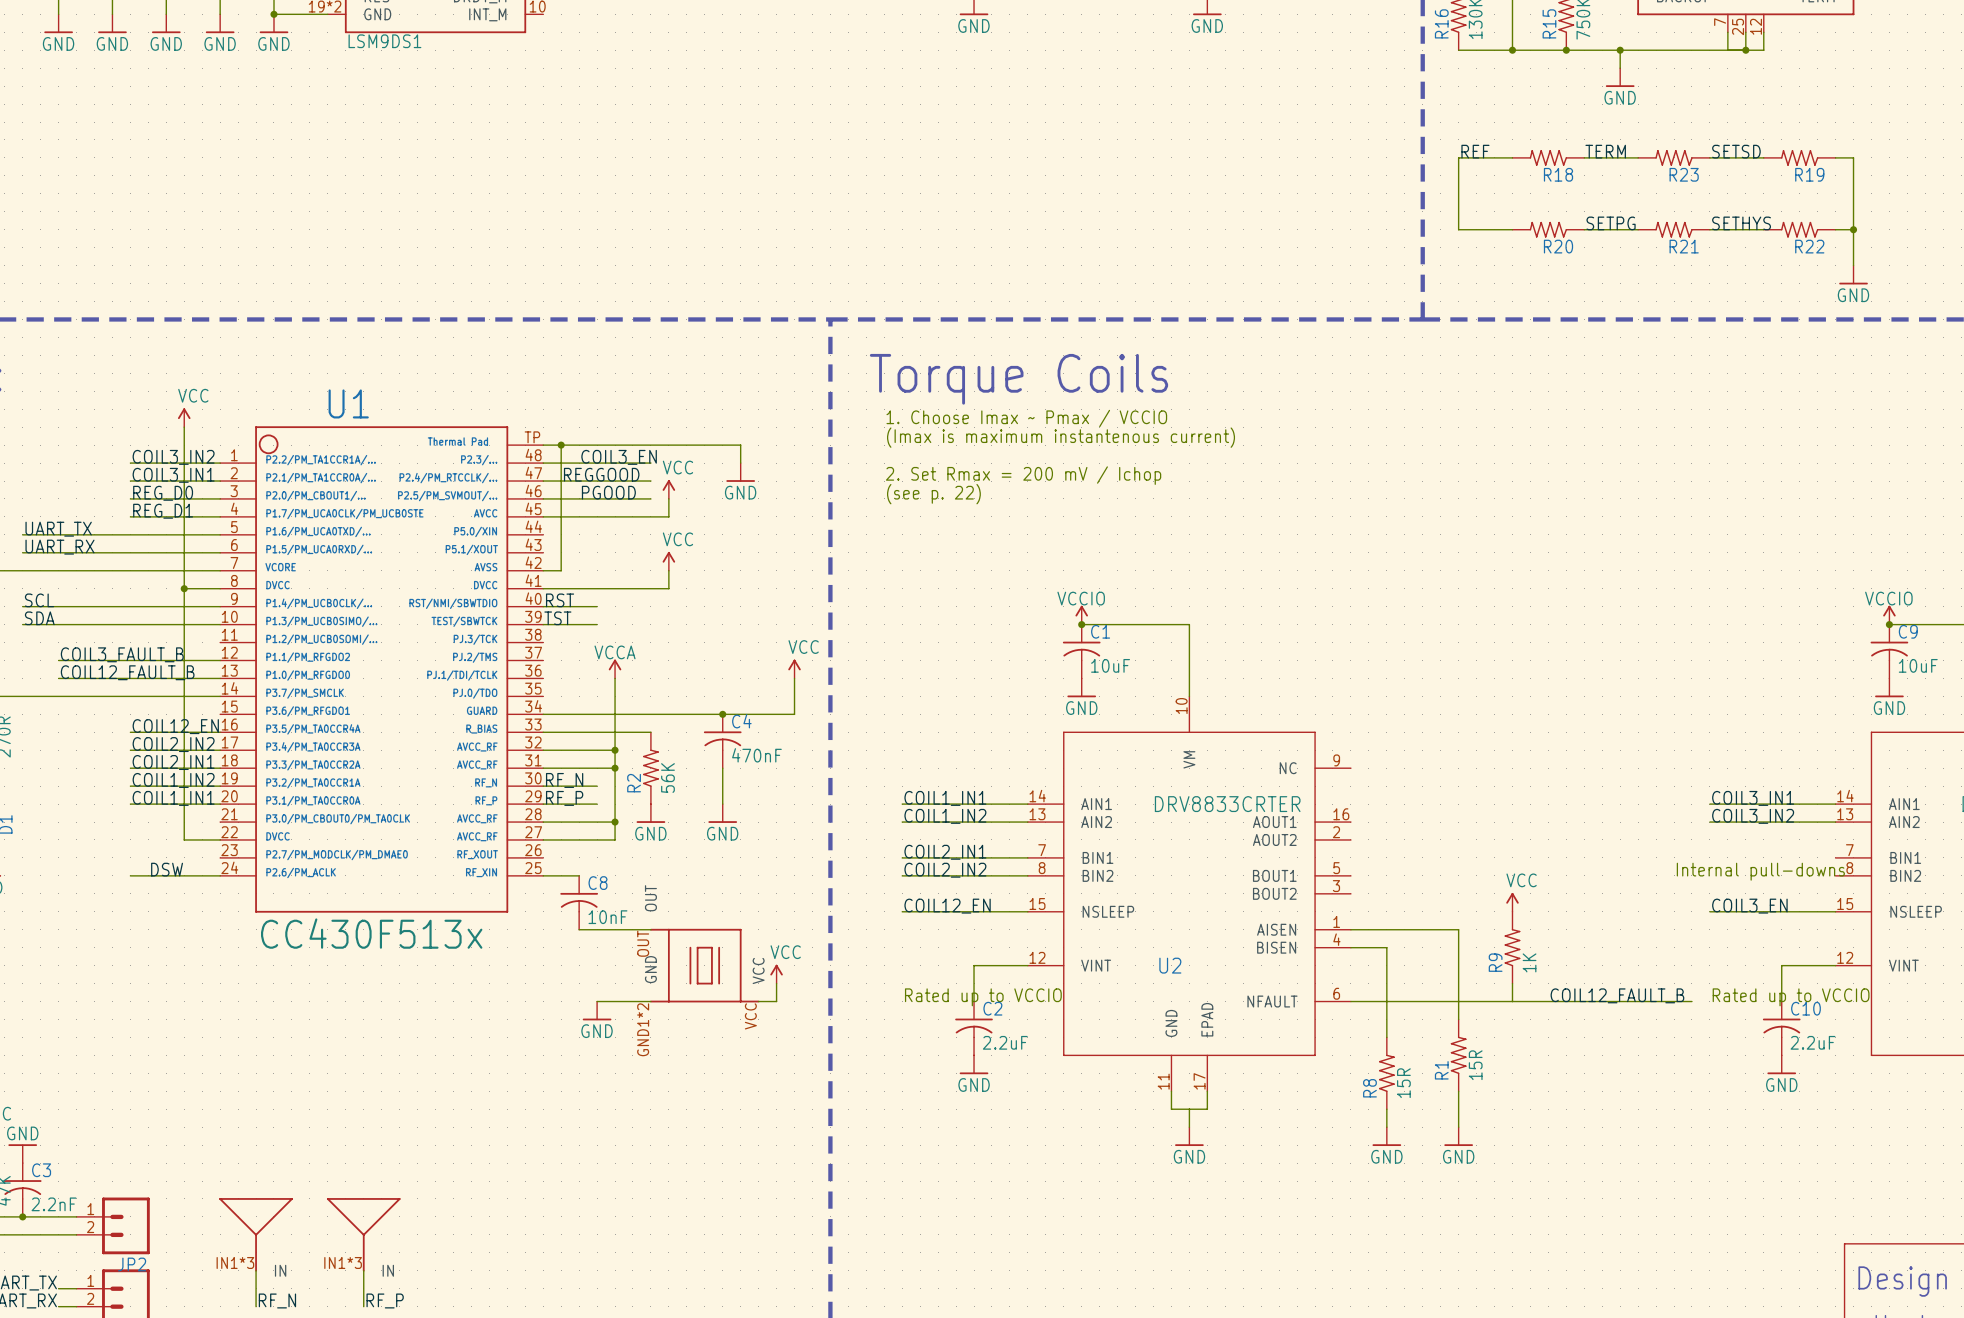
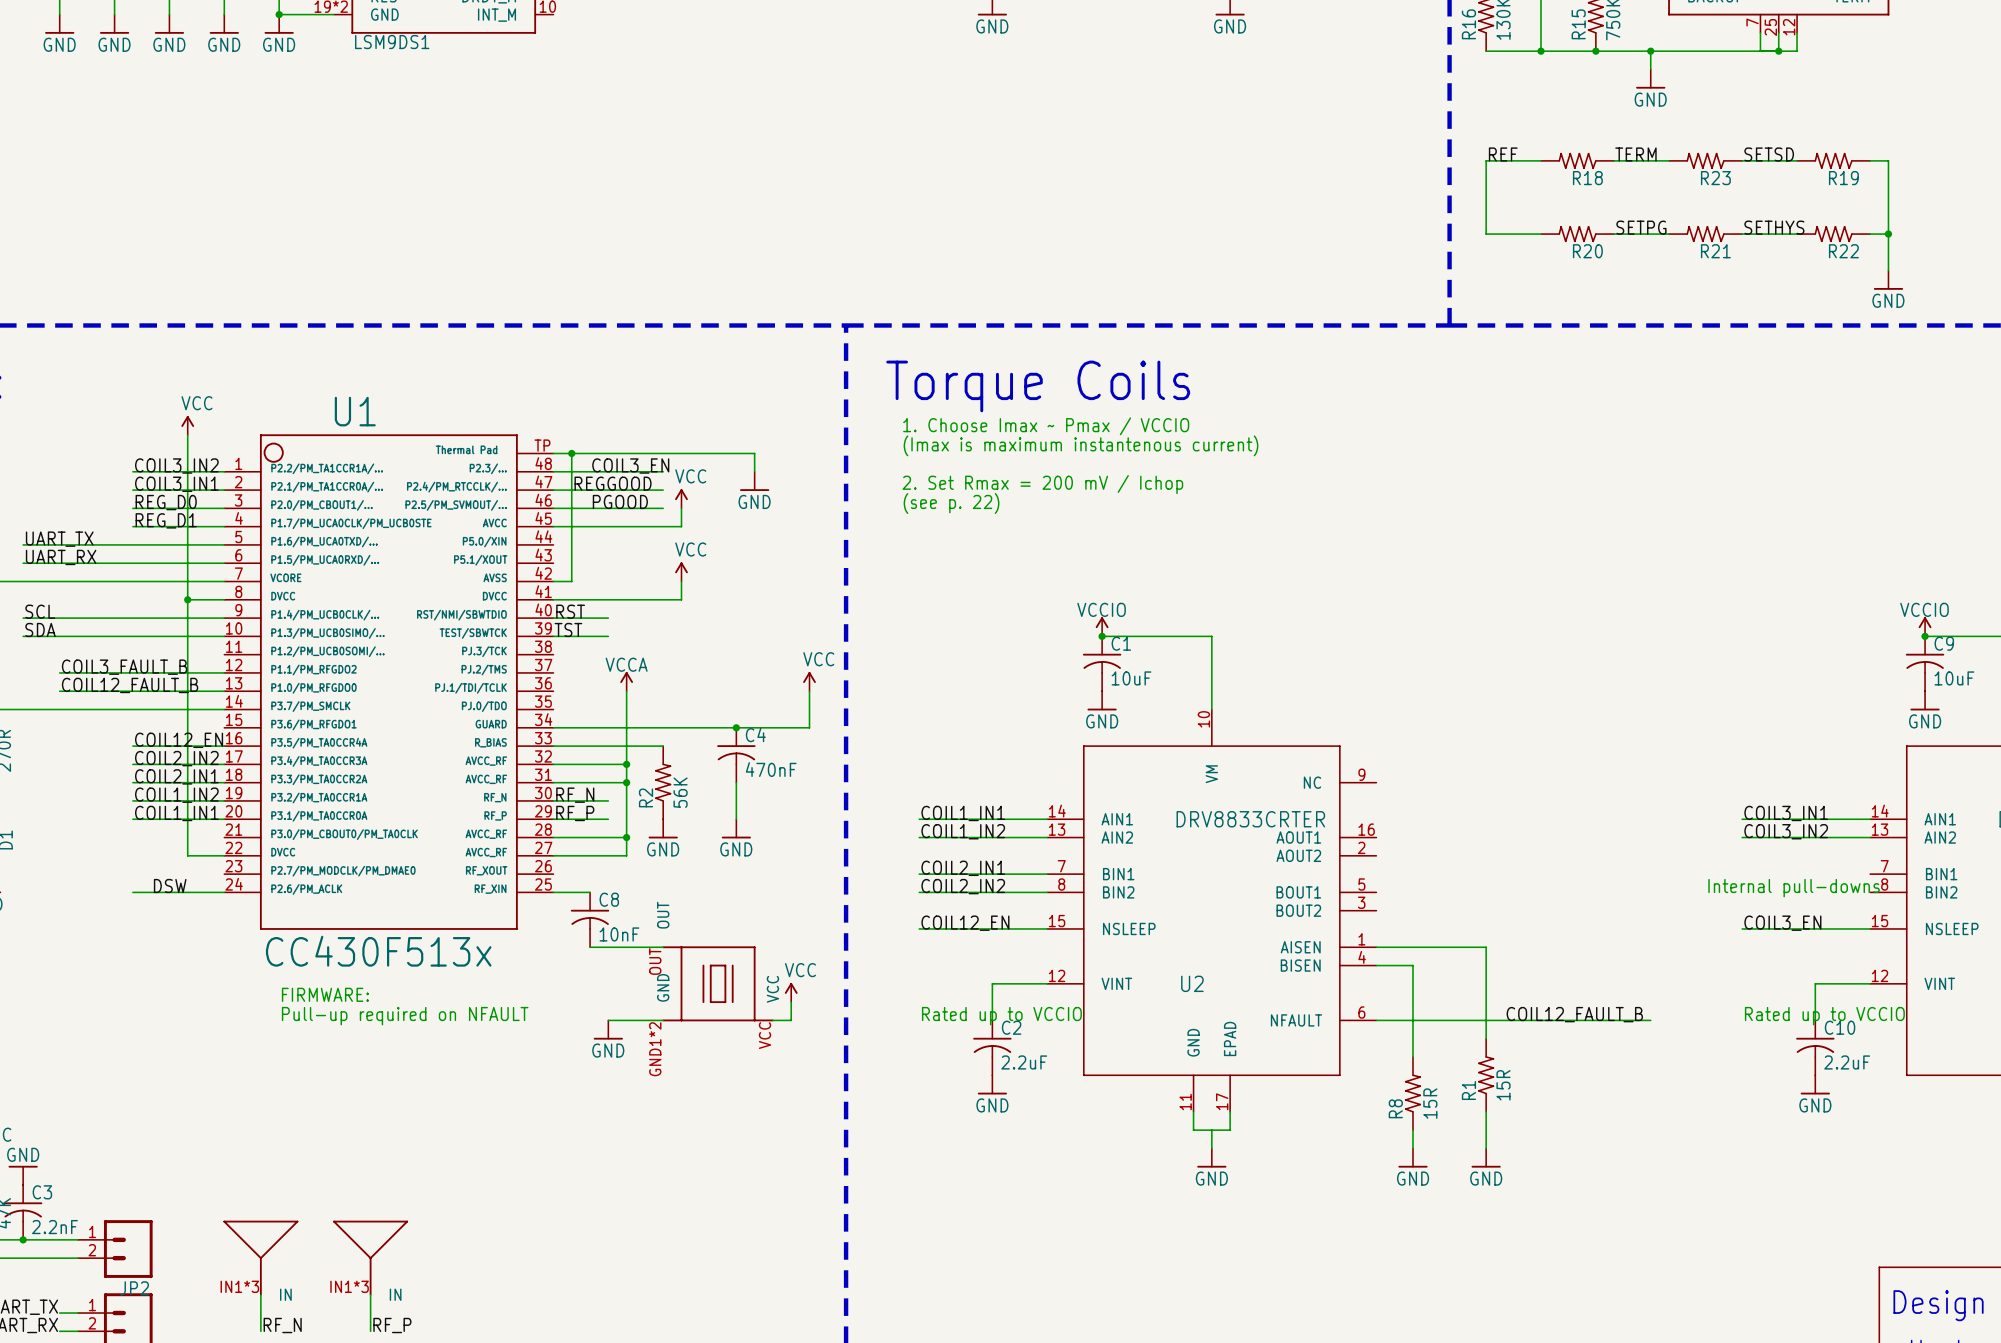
power symbol: VCC (1512, 902) -> none
R9: 1K (1512, 947) -> none
text: none -> FIRMWARE: (325, 994)
wire: (1512, 983) (1512, 1001) -> none
label position: COIL12_FAULT_B (1617, 995) -> COIL12_FAULT_B (1574, 1014)
text: none -> Pull-up required on NFAULT (405, 1016)
wire: (1620, 1001) (1691, 1001) -> none

